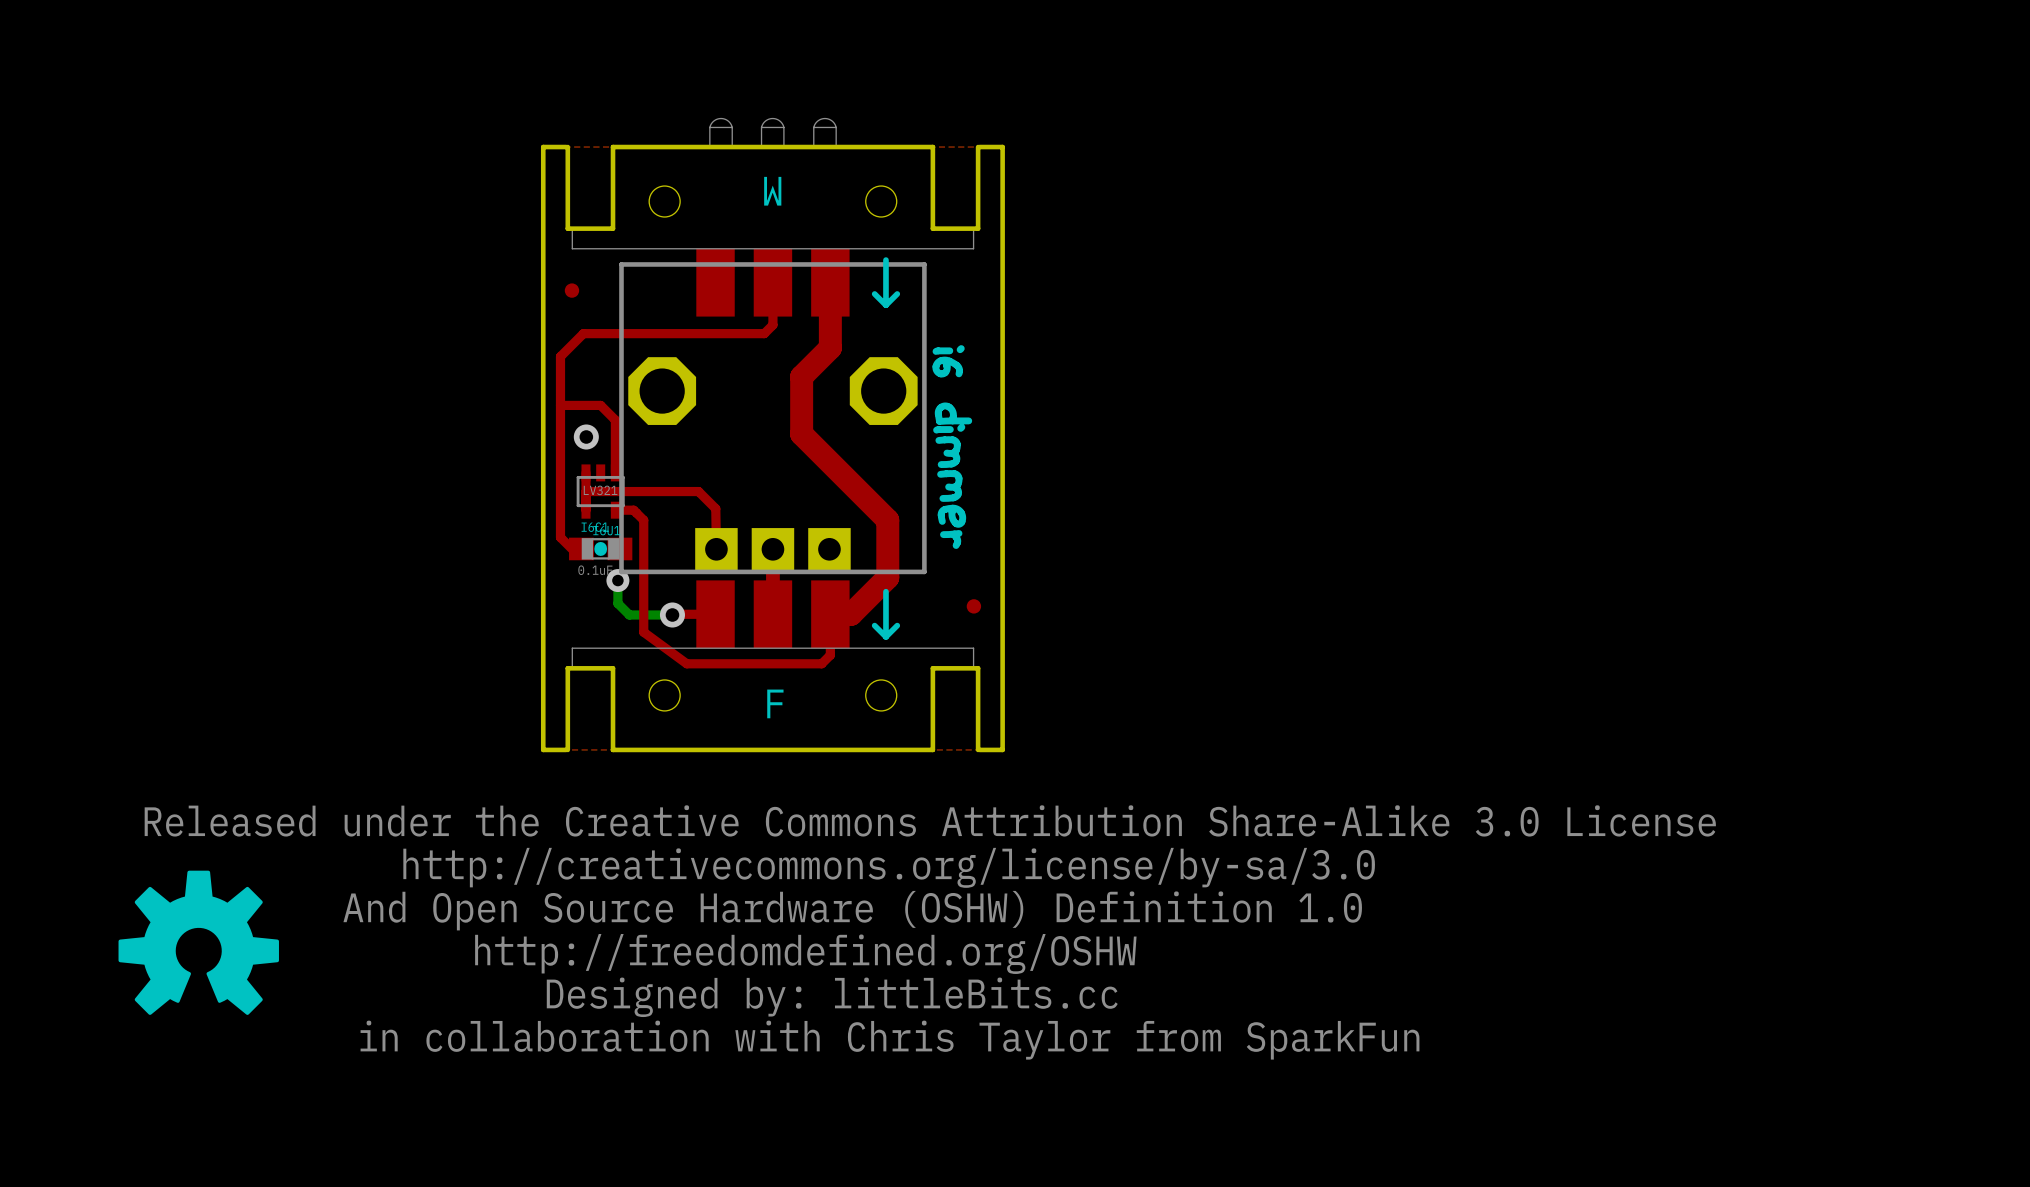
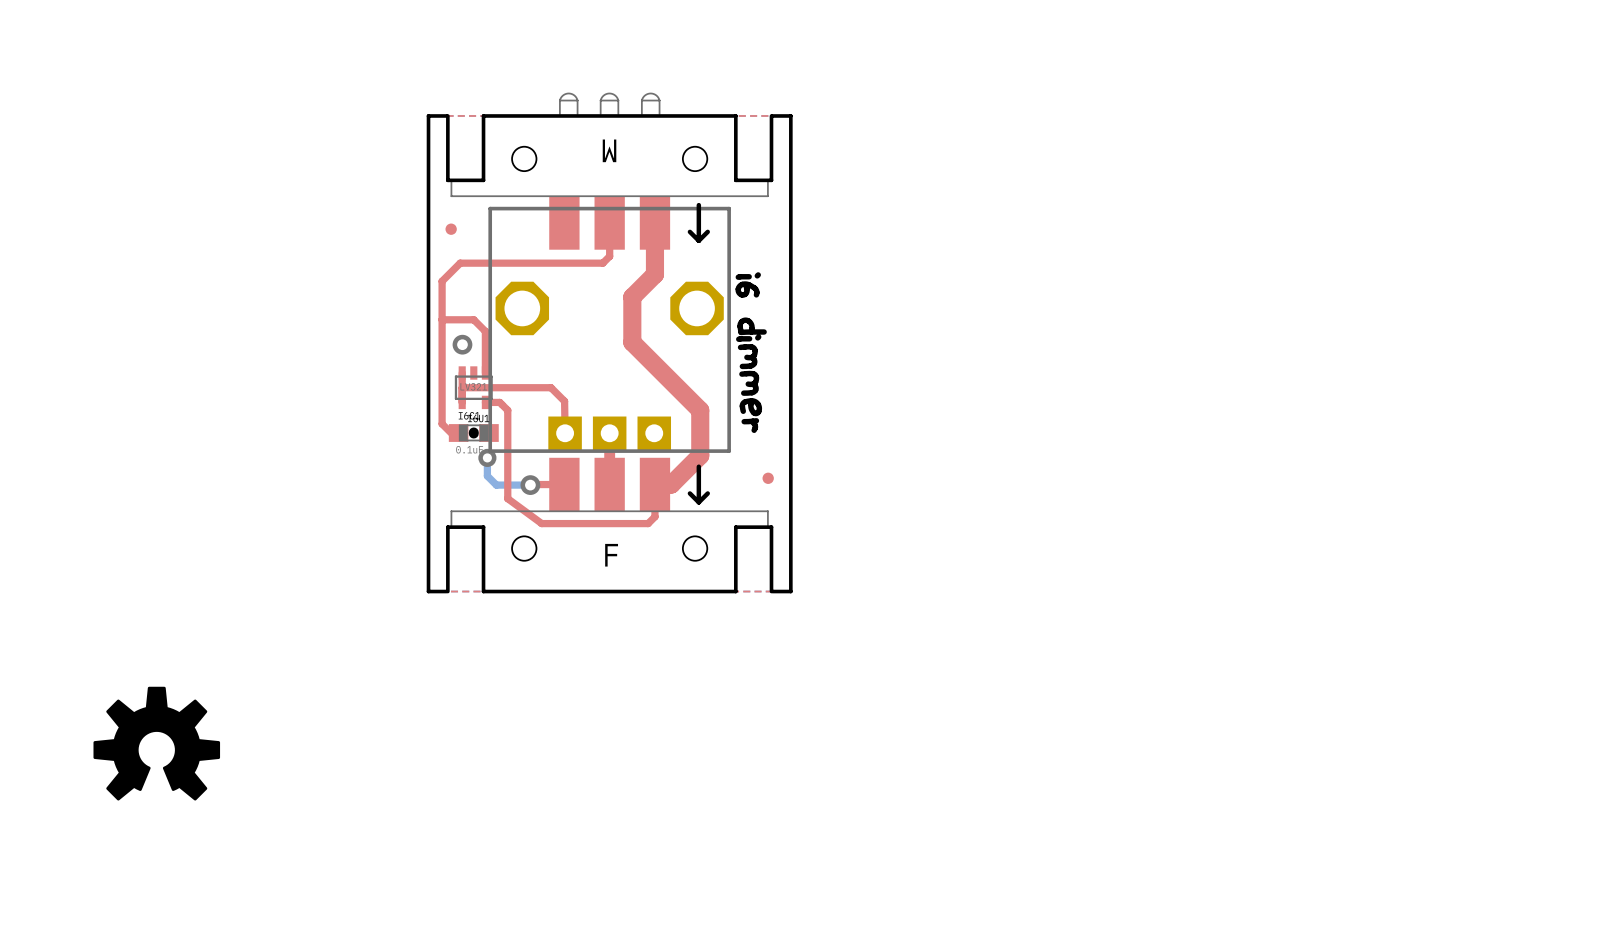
drawing: [144, 805, 1716, 1060] -> none

